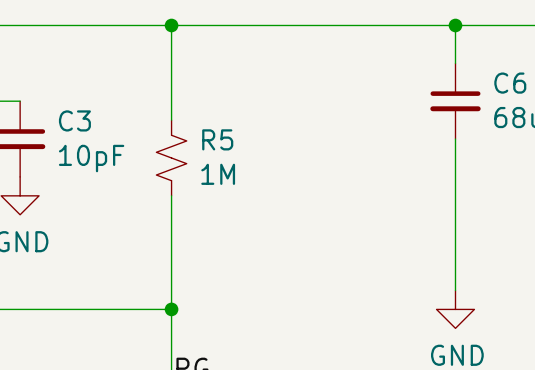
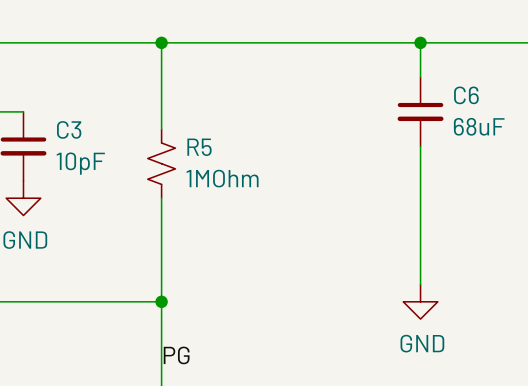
R5 value: 1M (218, 174) -> 1MOhm (222, 178)

